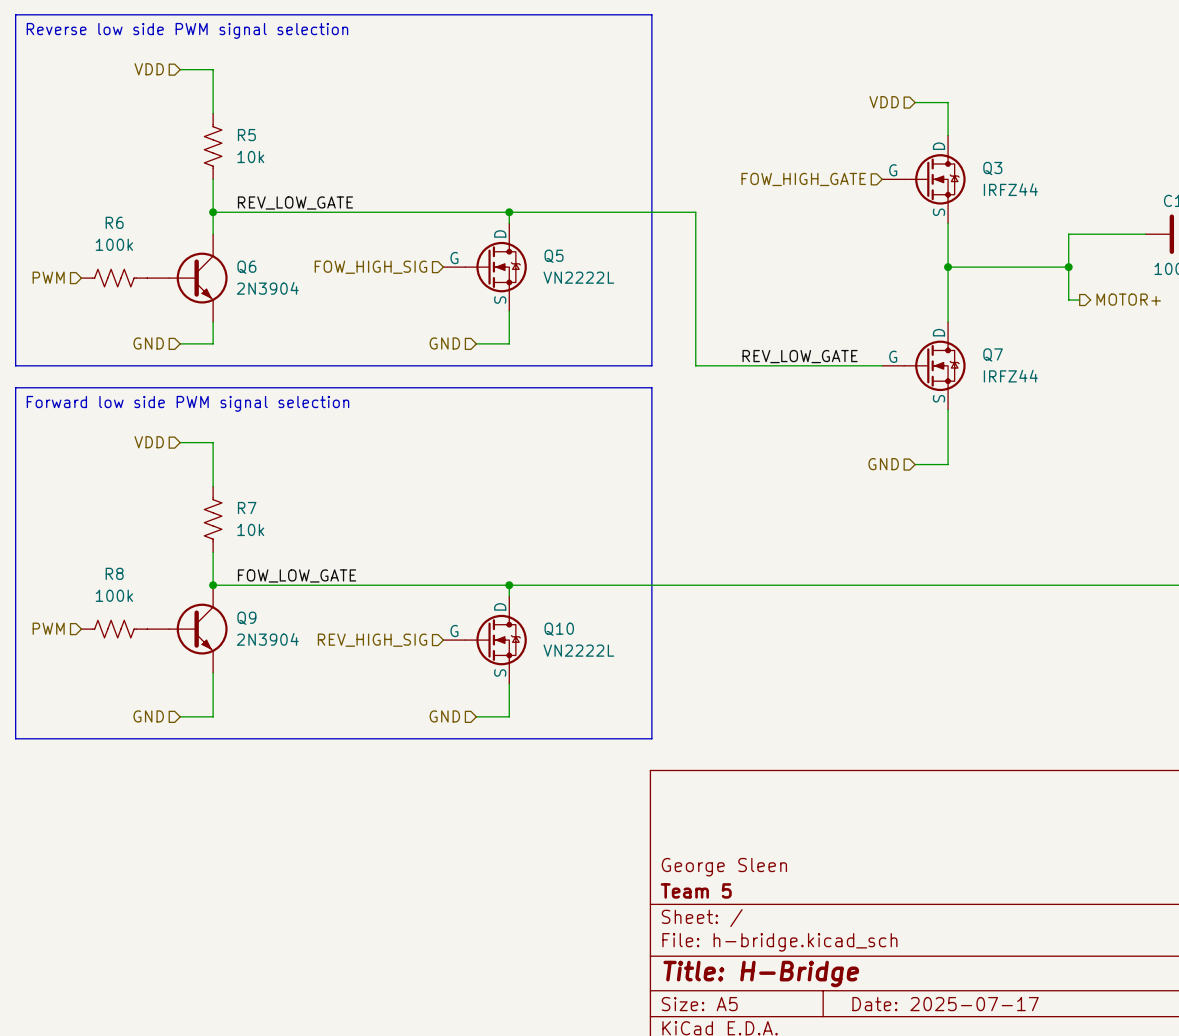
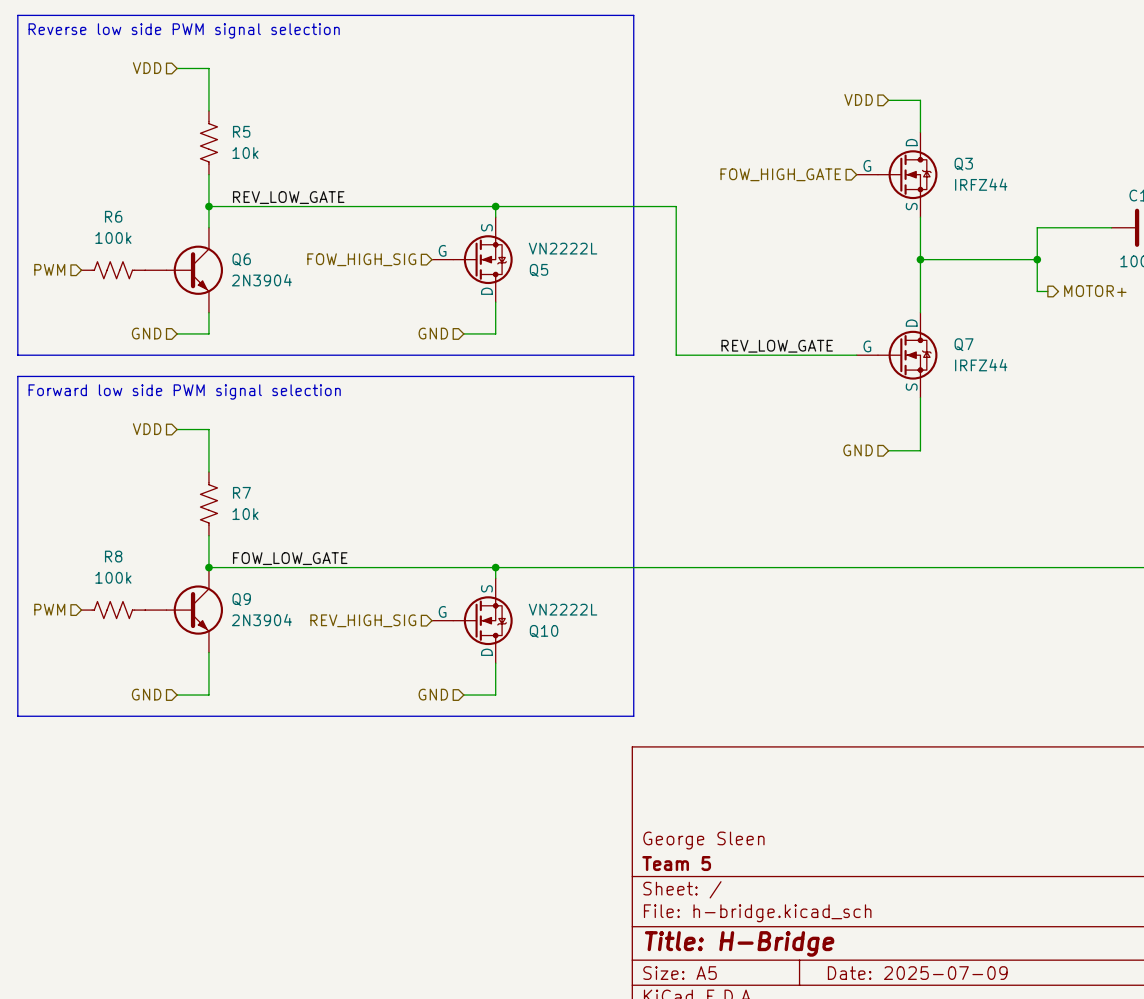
Q5 flip: as is (496, 267) -> up-down (482, 259)
Q10 flip: as is (496, 640) -> up-down (482, 620)
title block: Date: 2025-07-17 (945, 1004) -> Date: 2025-07-09 (917, 973)

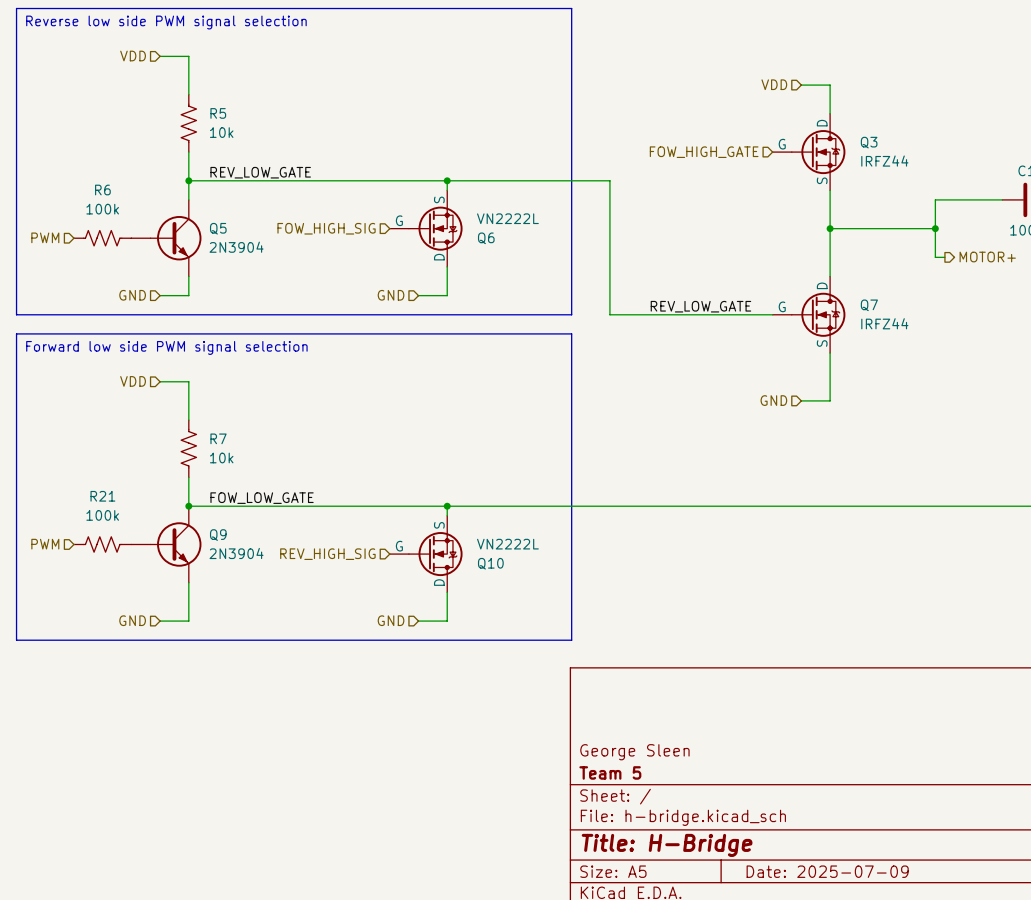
Q6 name: Q6 (241, 259) -> Q5 (218, 228)
Q5 name: Q5 (539, 270) -> Q6 (486, 238)
R8 name: R8 (113, 556) -> R21 (102, 496)

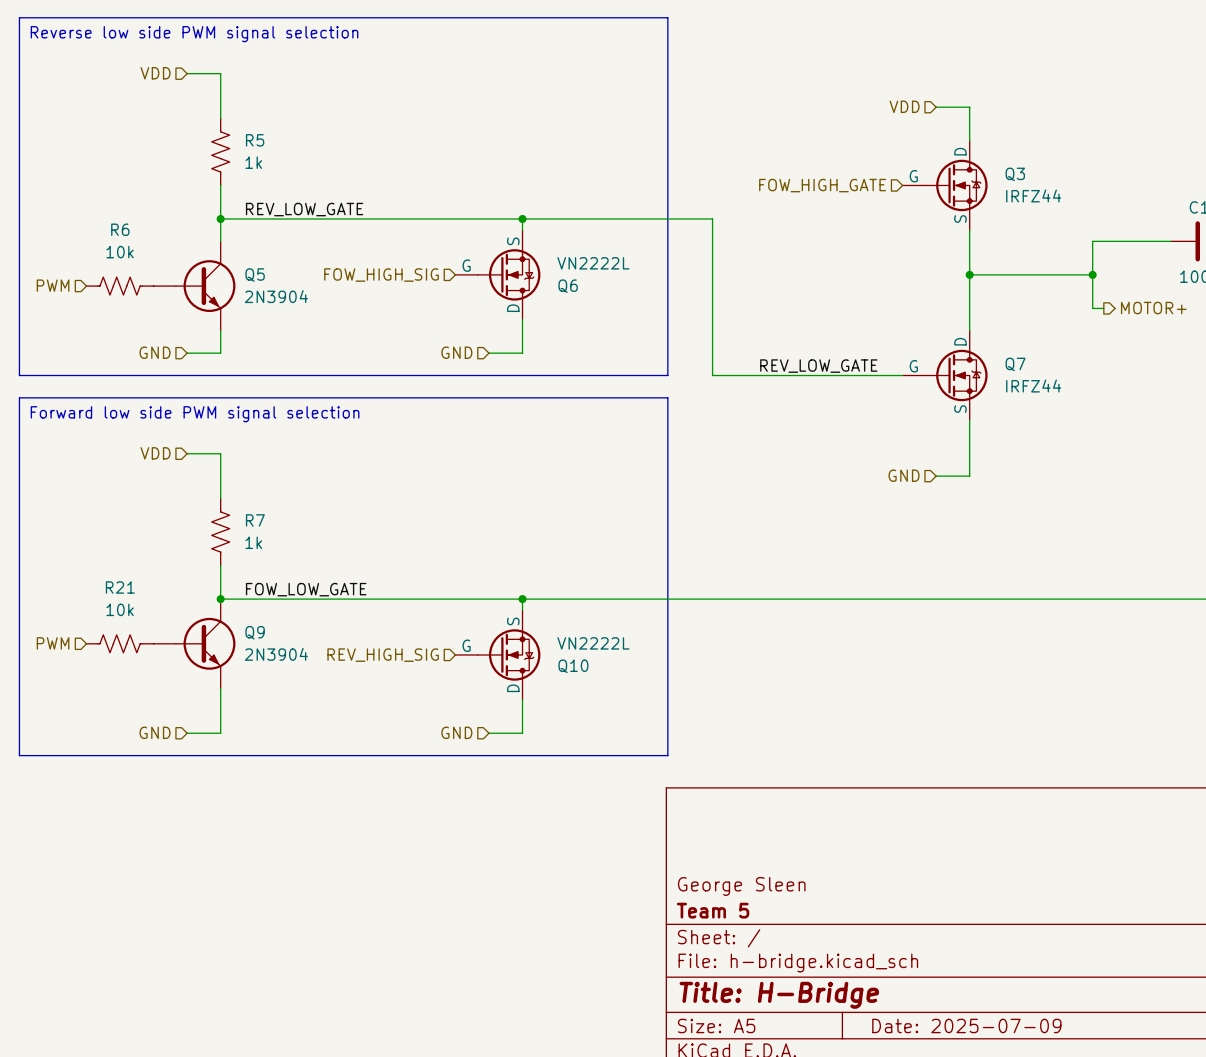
R5 value: 10k (221, 132) -> 1k (253, 162)
R6 value: 100k (102, 209) -> 10k (120, 252)
R7 value: 10k (221, 457) -> 1k (253, 542)
R21 value: 100k (102, 515) -> 10k (120, 609)

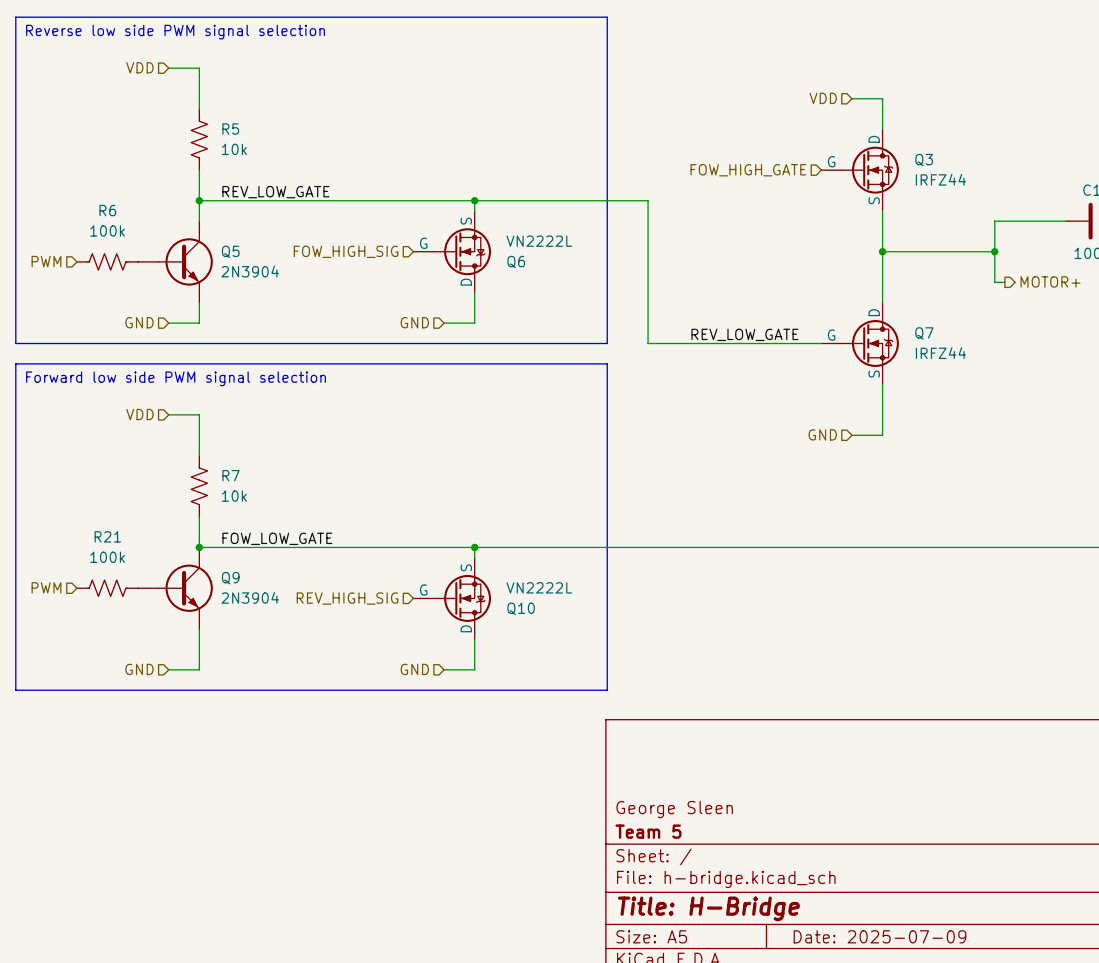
R5 value: 1k (253, 162) -> 10k (234, 149)
R6 value: 10k (120, 252) -> 100k (107, 230)
R7 value: 1k (253, 542) -> 10k (234, 496)
R21 value: 10k (120, 609) -> 100k (107, 557)

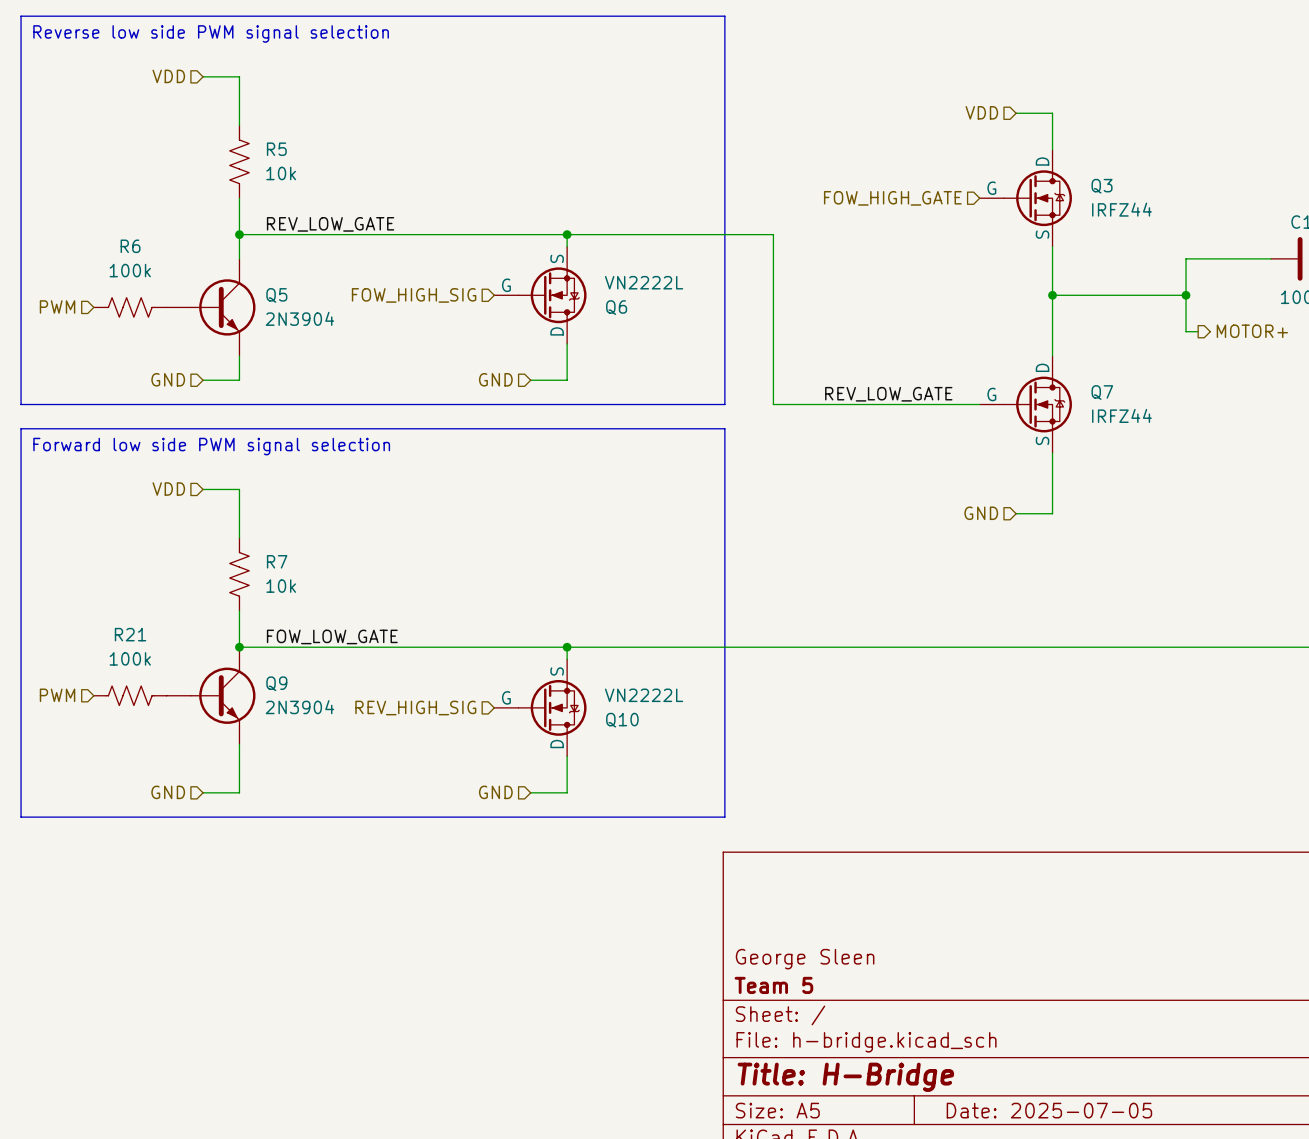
title block: Date: 2025-07-09 (879, 936) -> Date: 2025-07-05 (1049, 1110)

